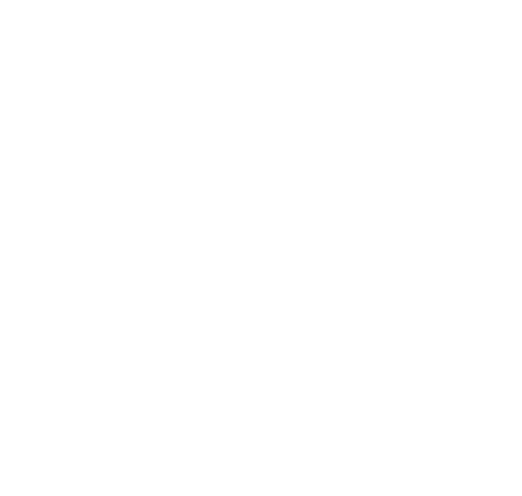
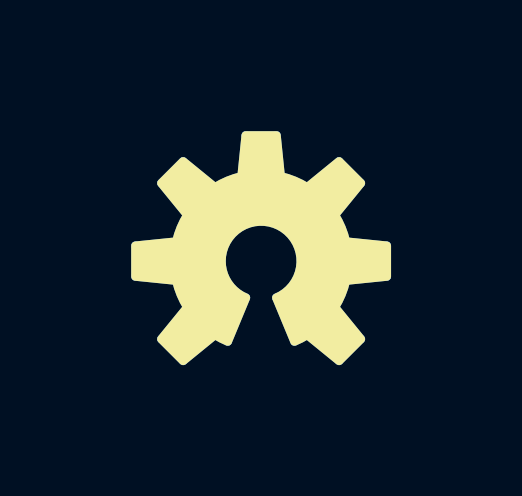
drawing: none -> [131, 131, 392, 366]

